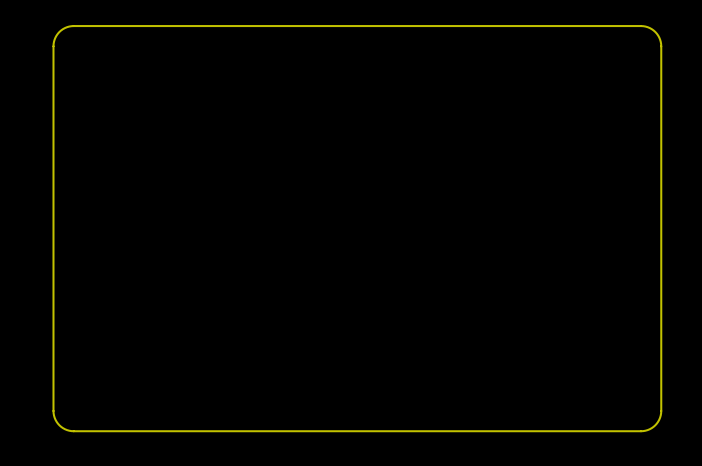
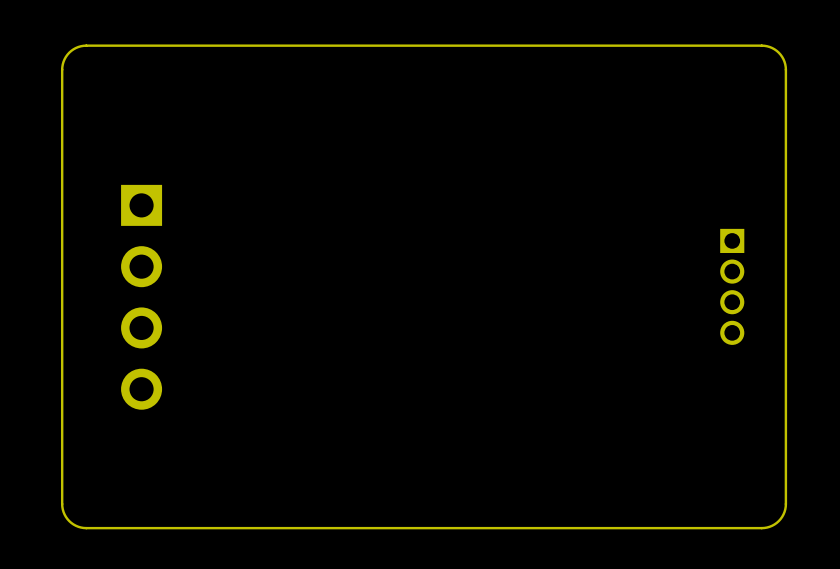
part: none -> (732, 286)
part: none -> (141, 297)

